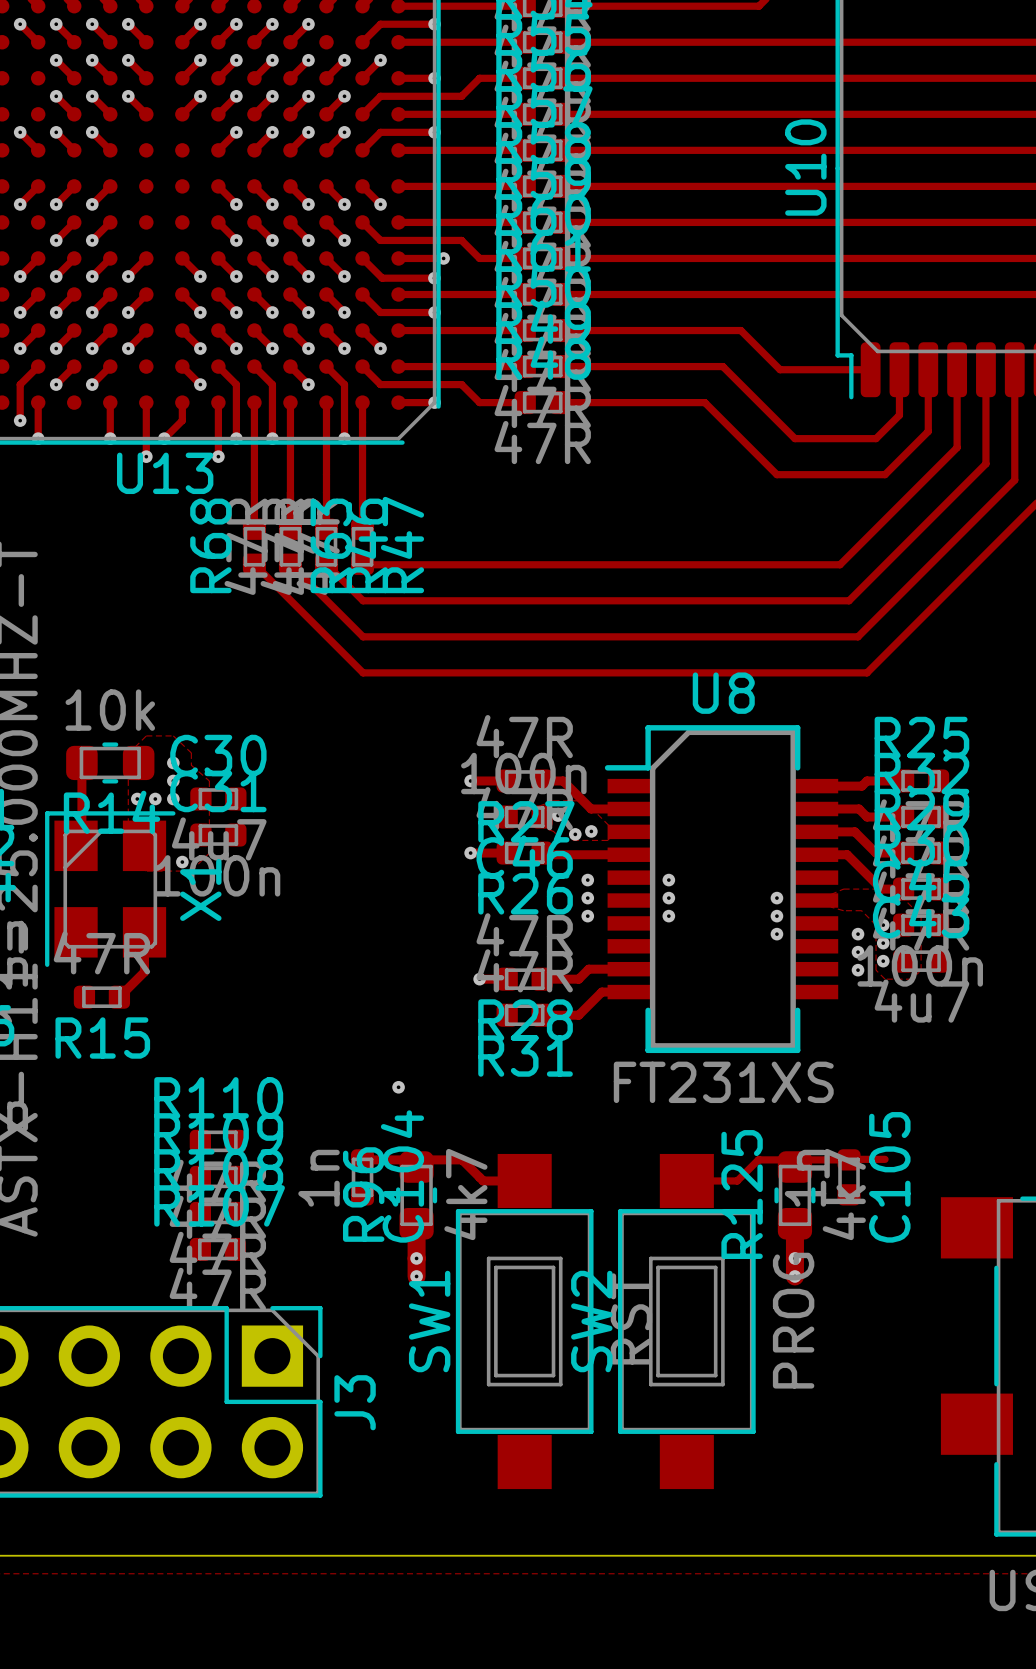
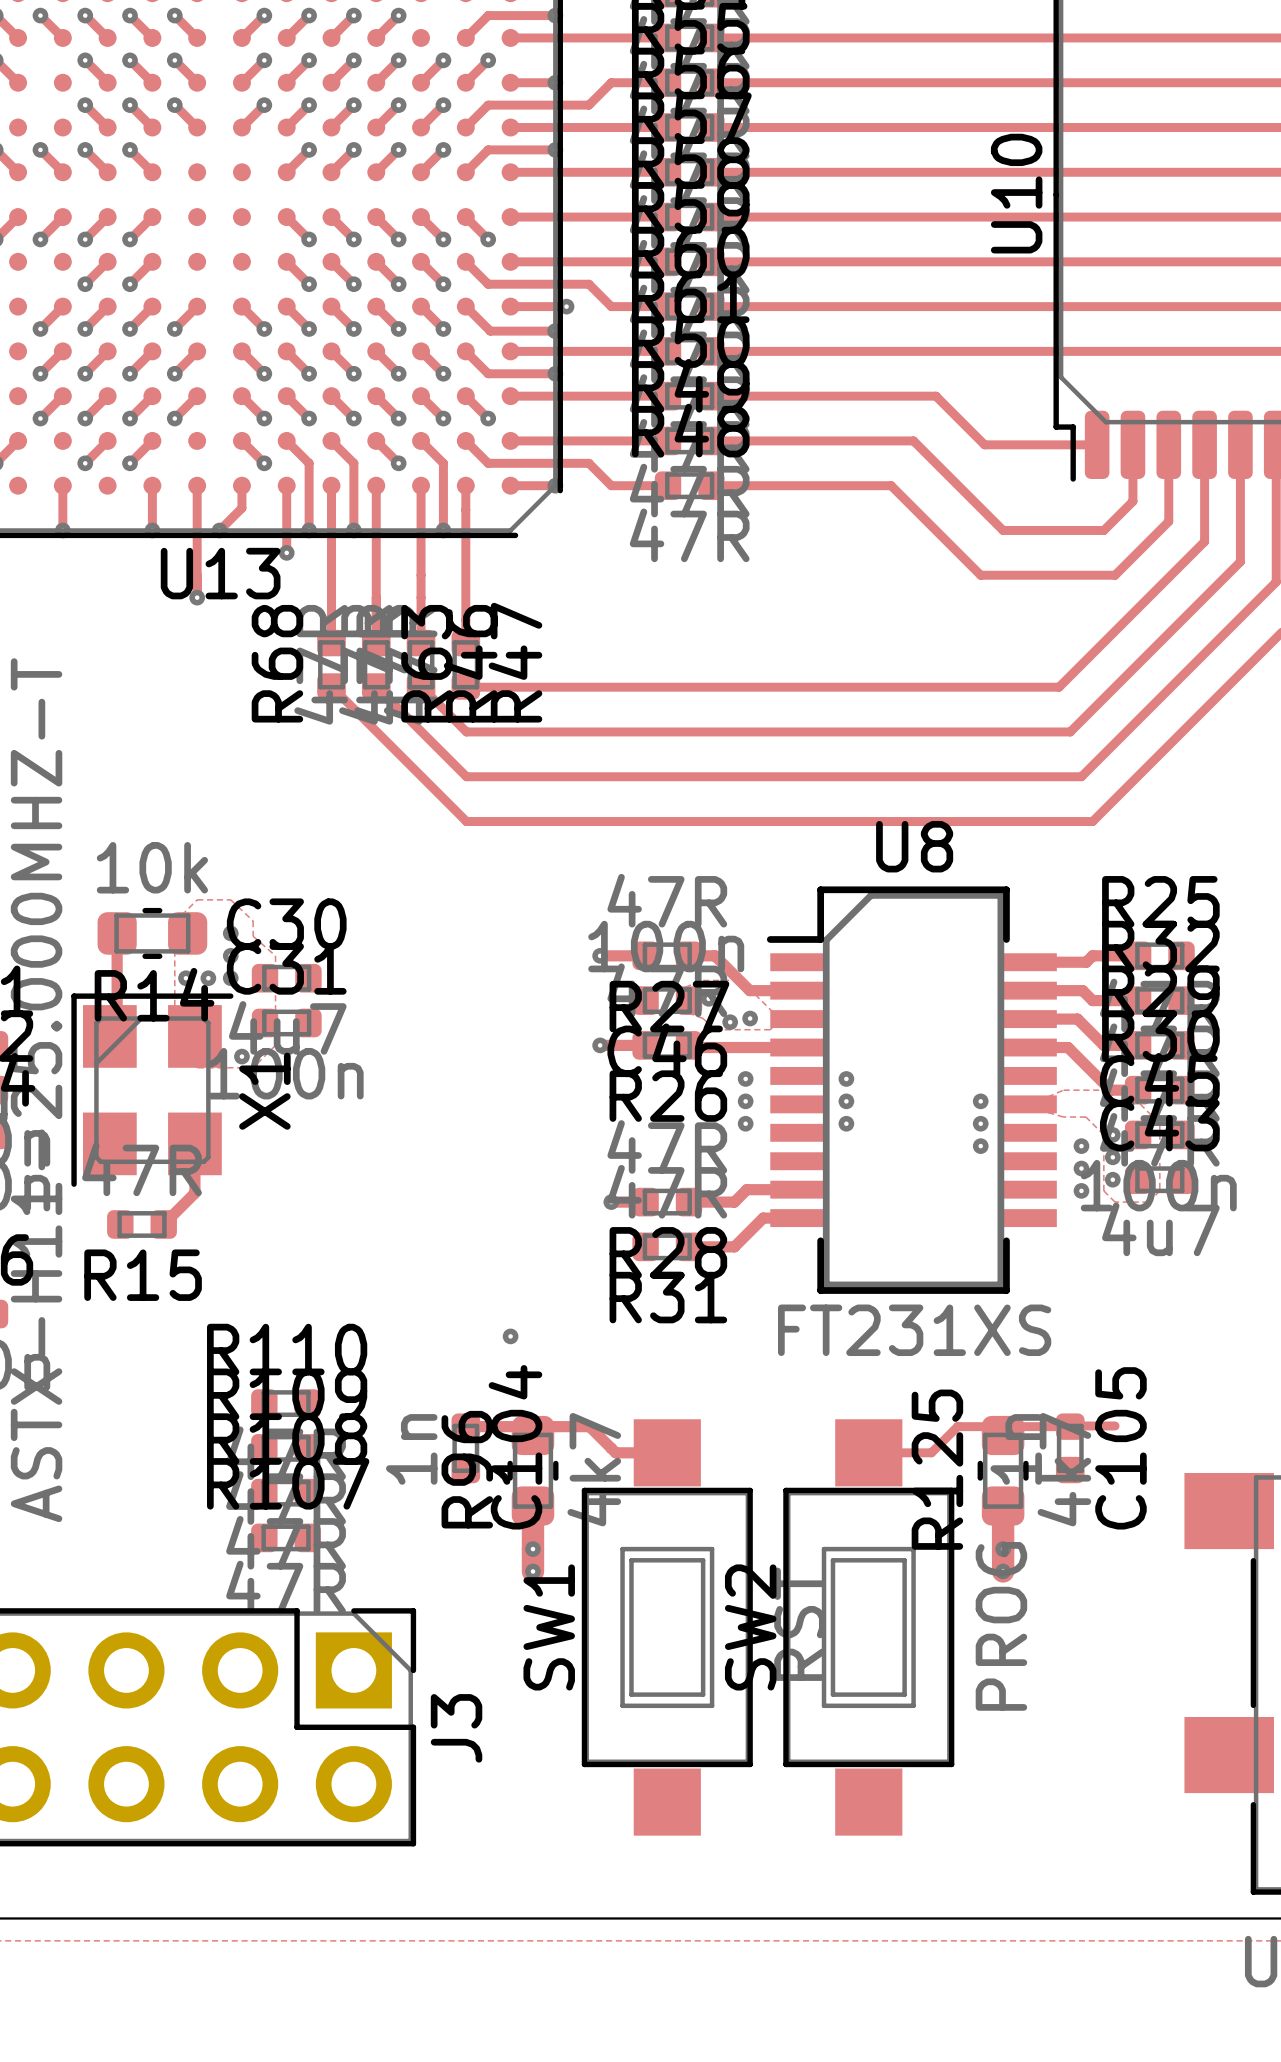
track: (38, 366) (20, 384) (20, 420) -> none
via: (20, 420) -> none
track: none -> (197, 552) (197, 597)
via position: (146, 456) -> (197, 597)

